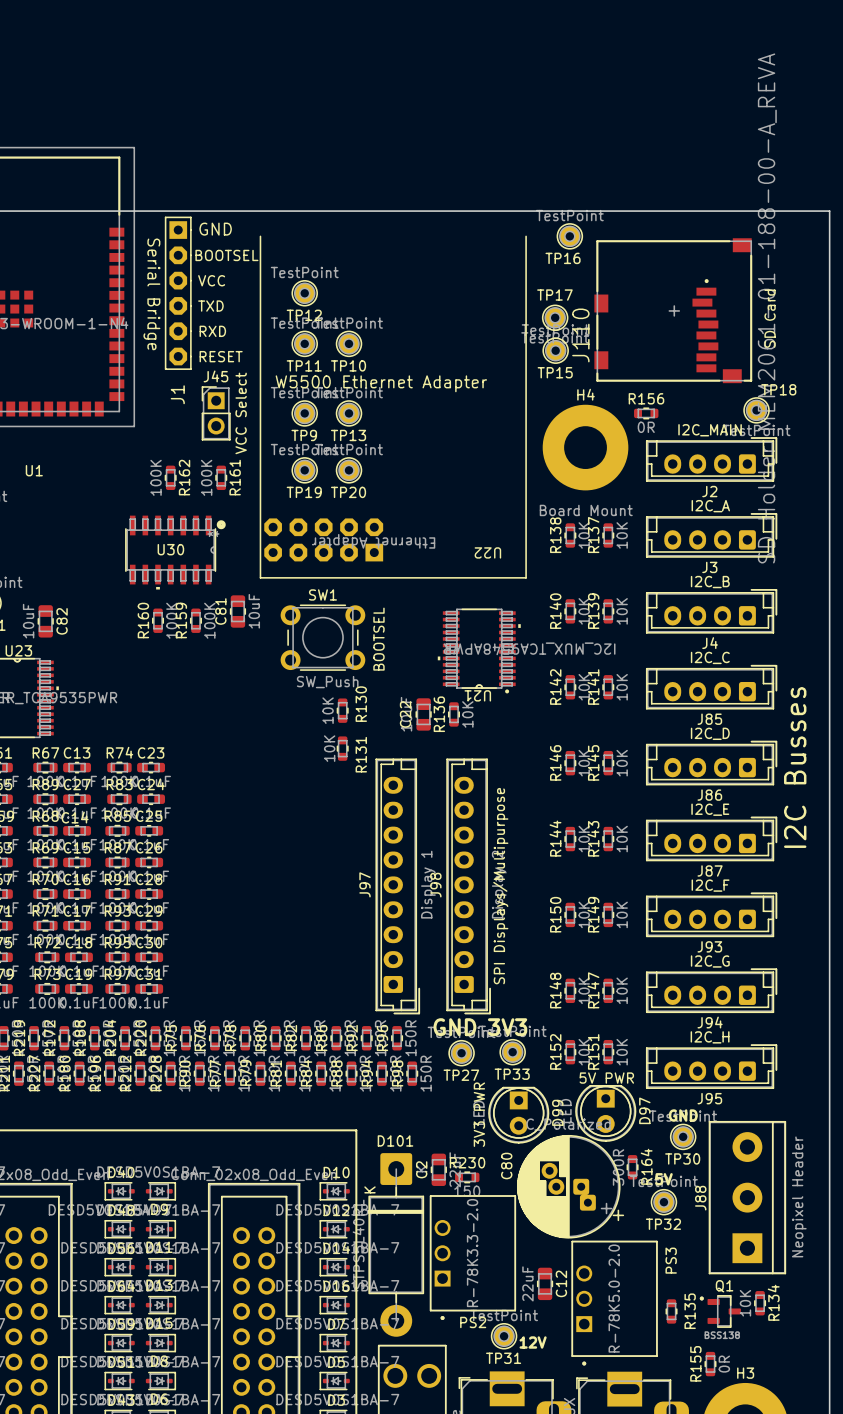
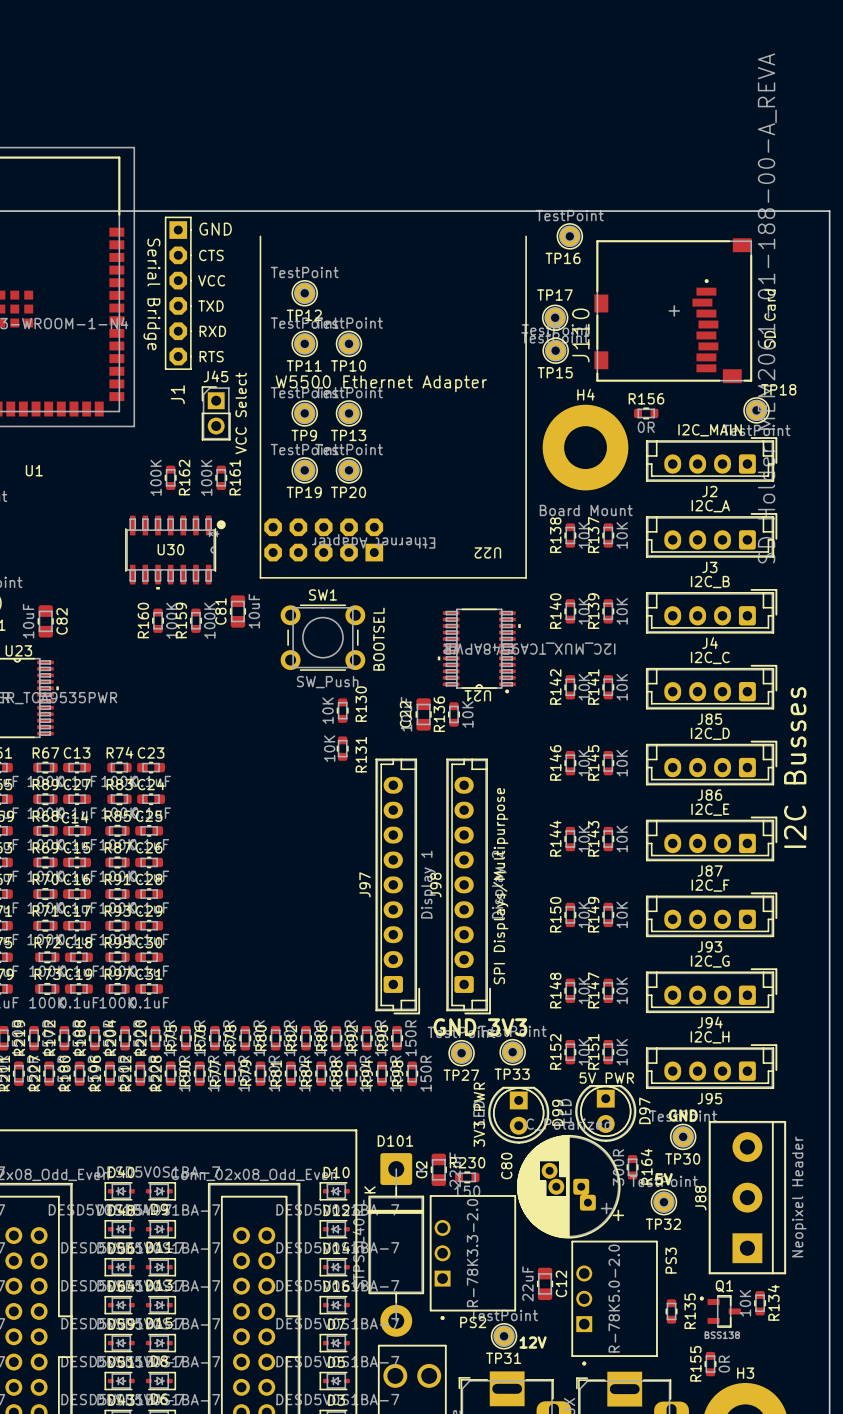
J1 text: none -> CTS (211, 255)
J1 text: BOOTSEL (226, 255) -> none
J1 text: RESET (221, 356) -> RTS (211, 356)

